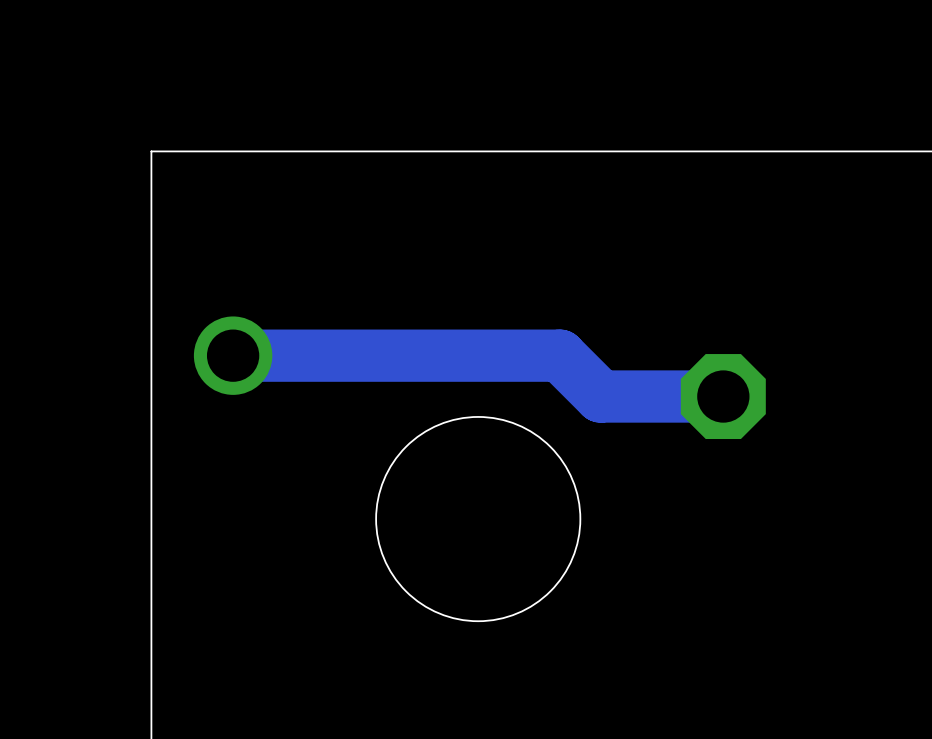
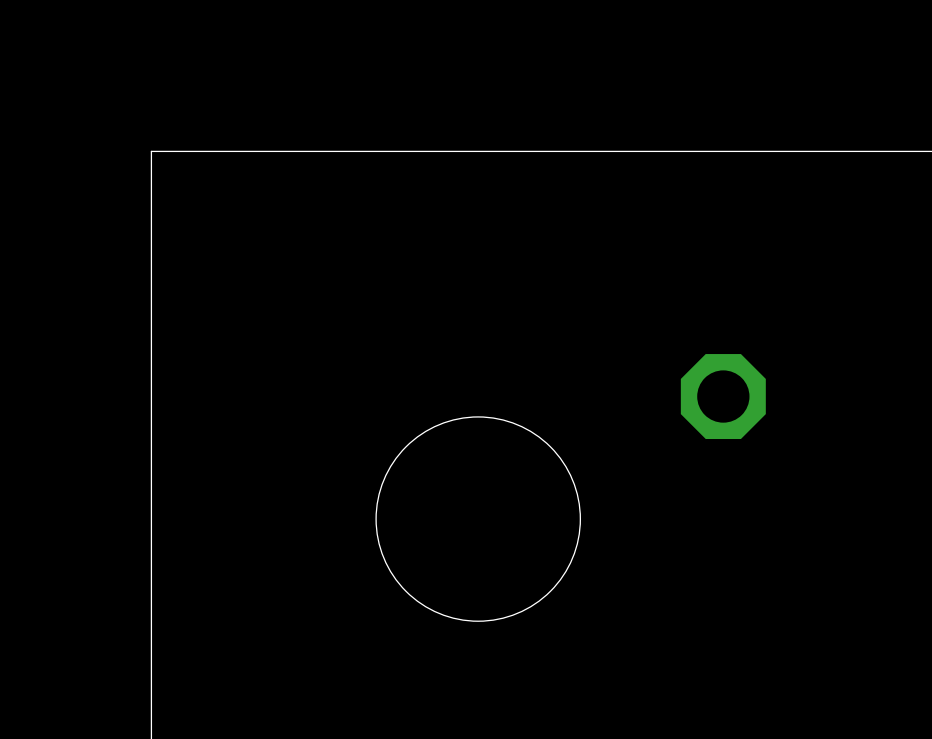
track: (233, 355) (559, 355) (600, 396) (723, 396) -> none
via: (233, 355) -> none

